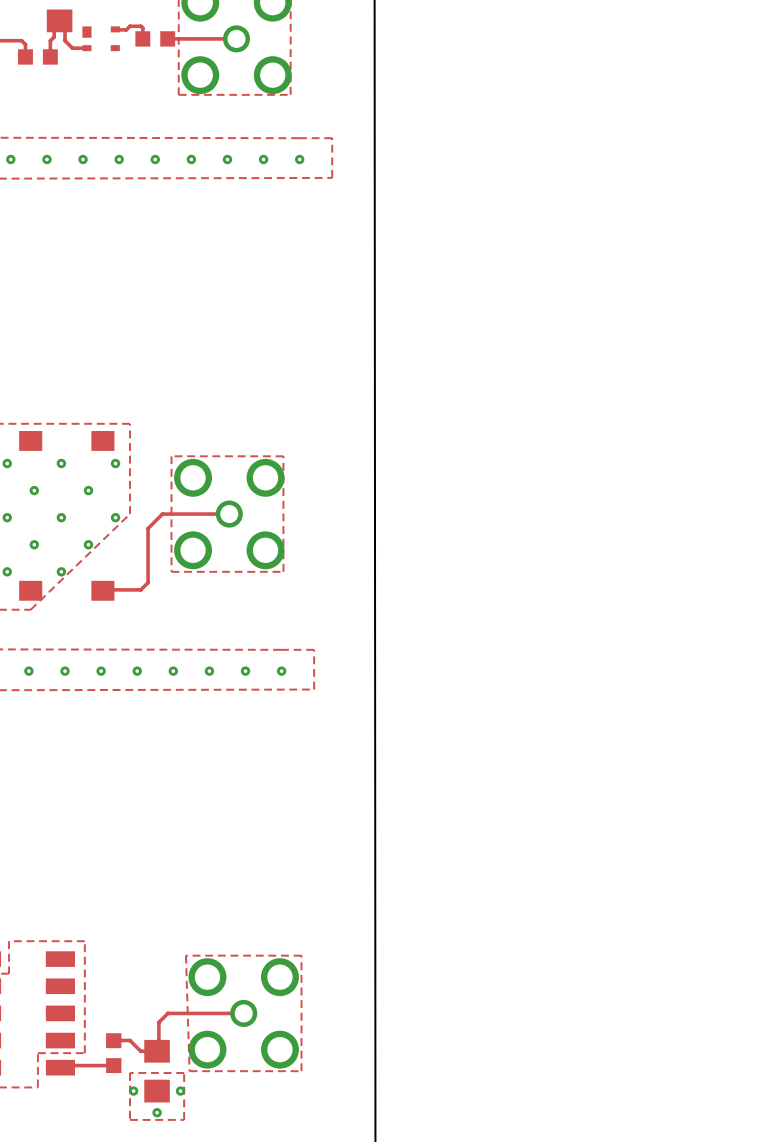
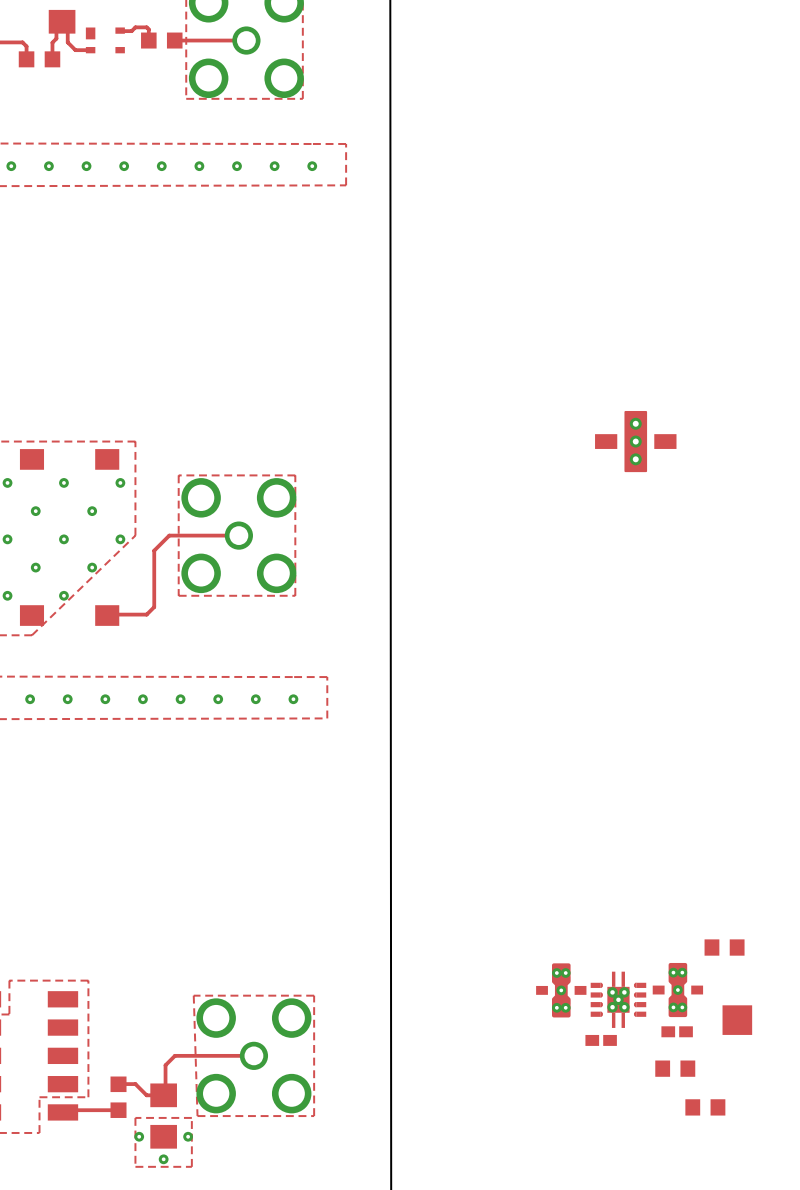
part: none -> (635, 441)
part: none -> (724, 947)
part: none -> (561, 990)
part: none -> (677, 990)
part: none -> (618, 999)
part: none -> (737, 1020)
part: none -> (677, 1031)
part: none -> (601, 1040)
part: none -> (675, 1068)
part: none -> (705, 1107)

